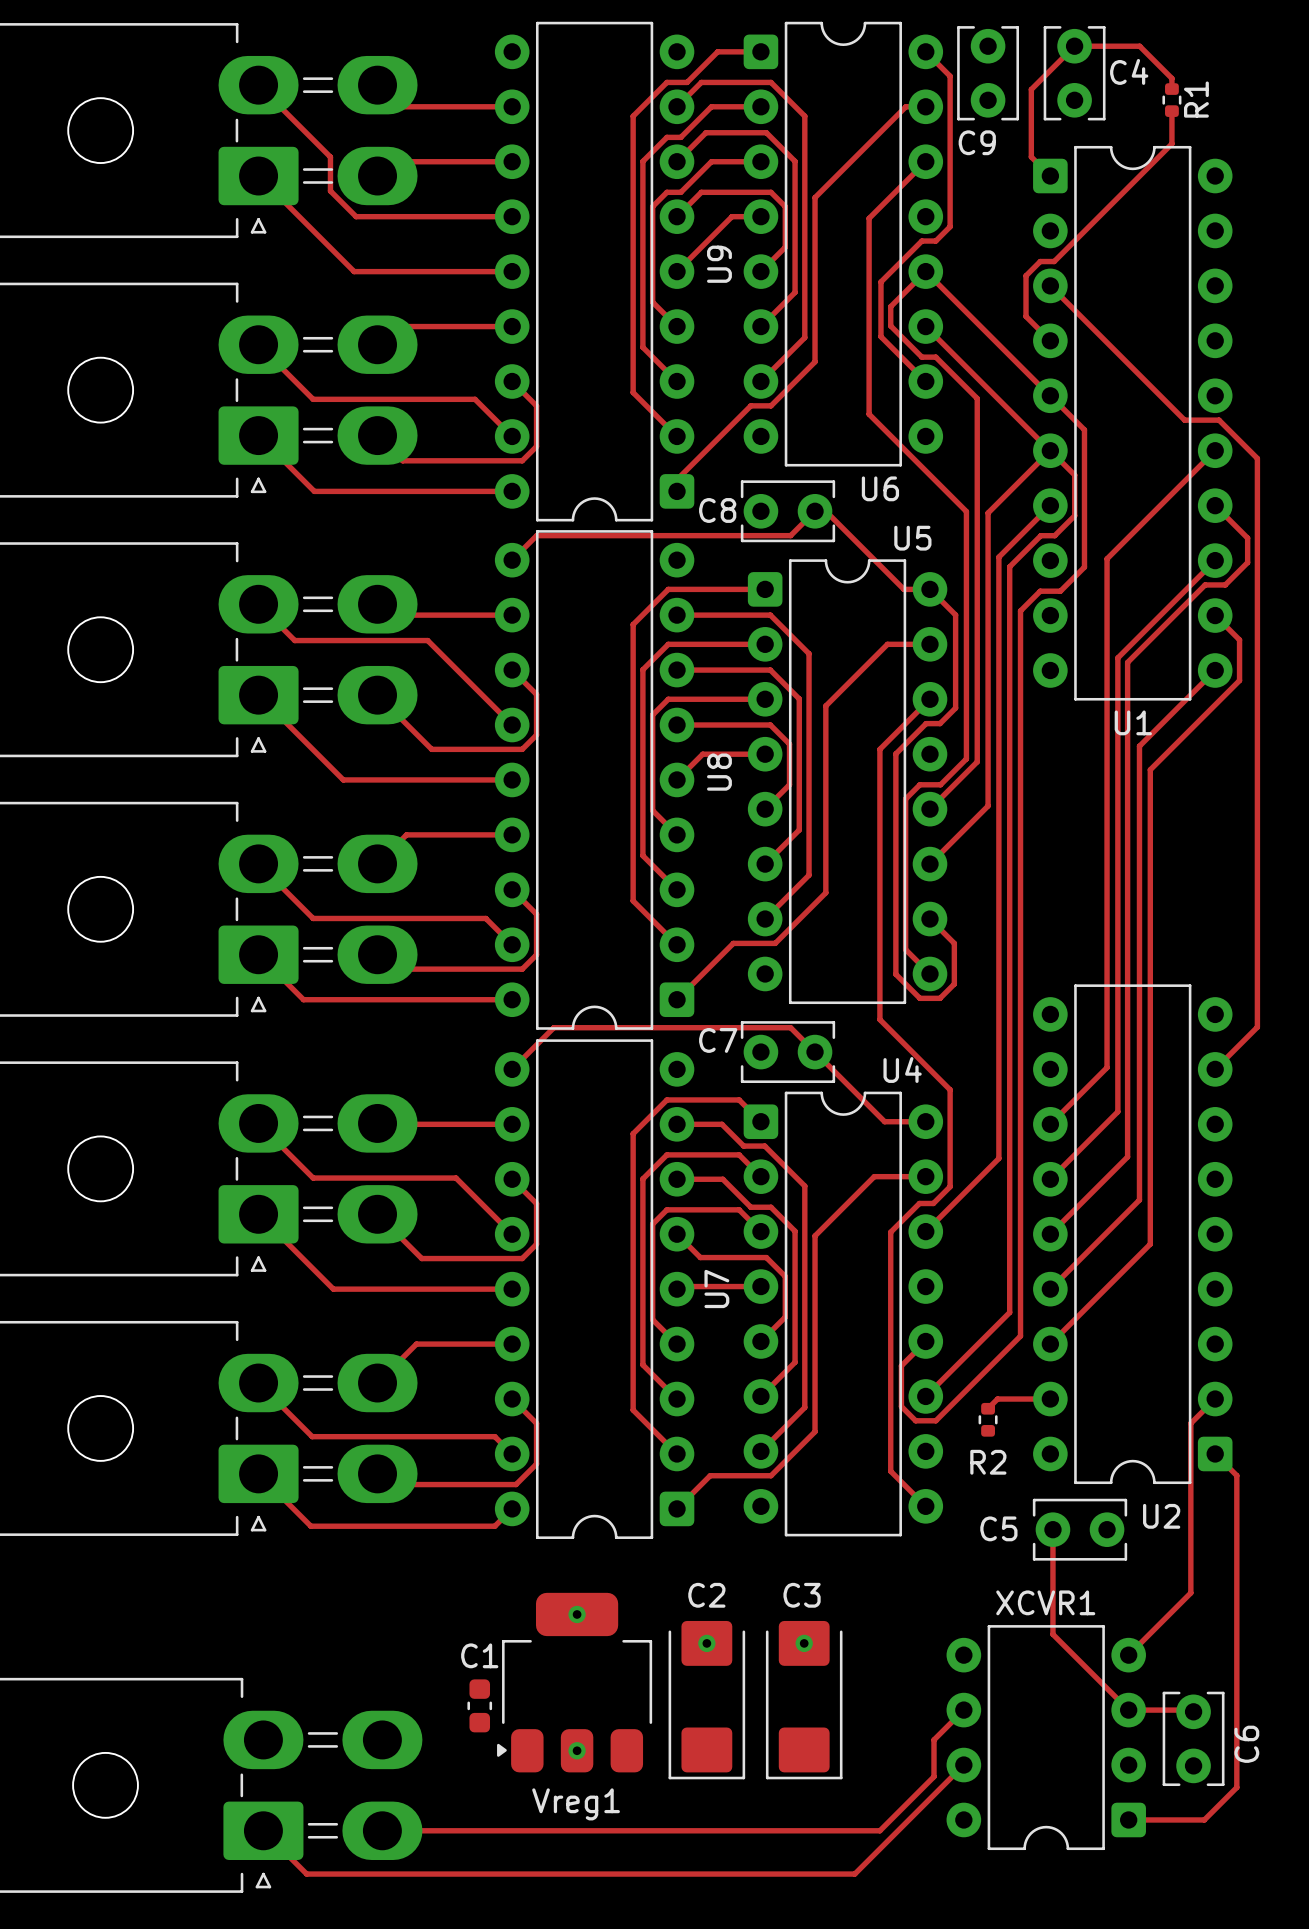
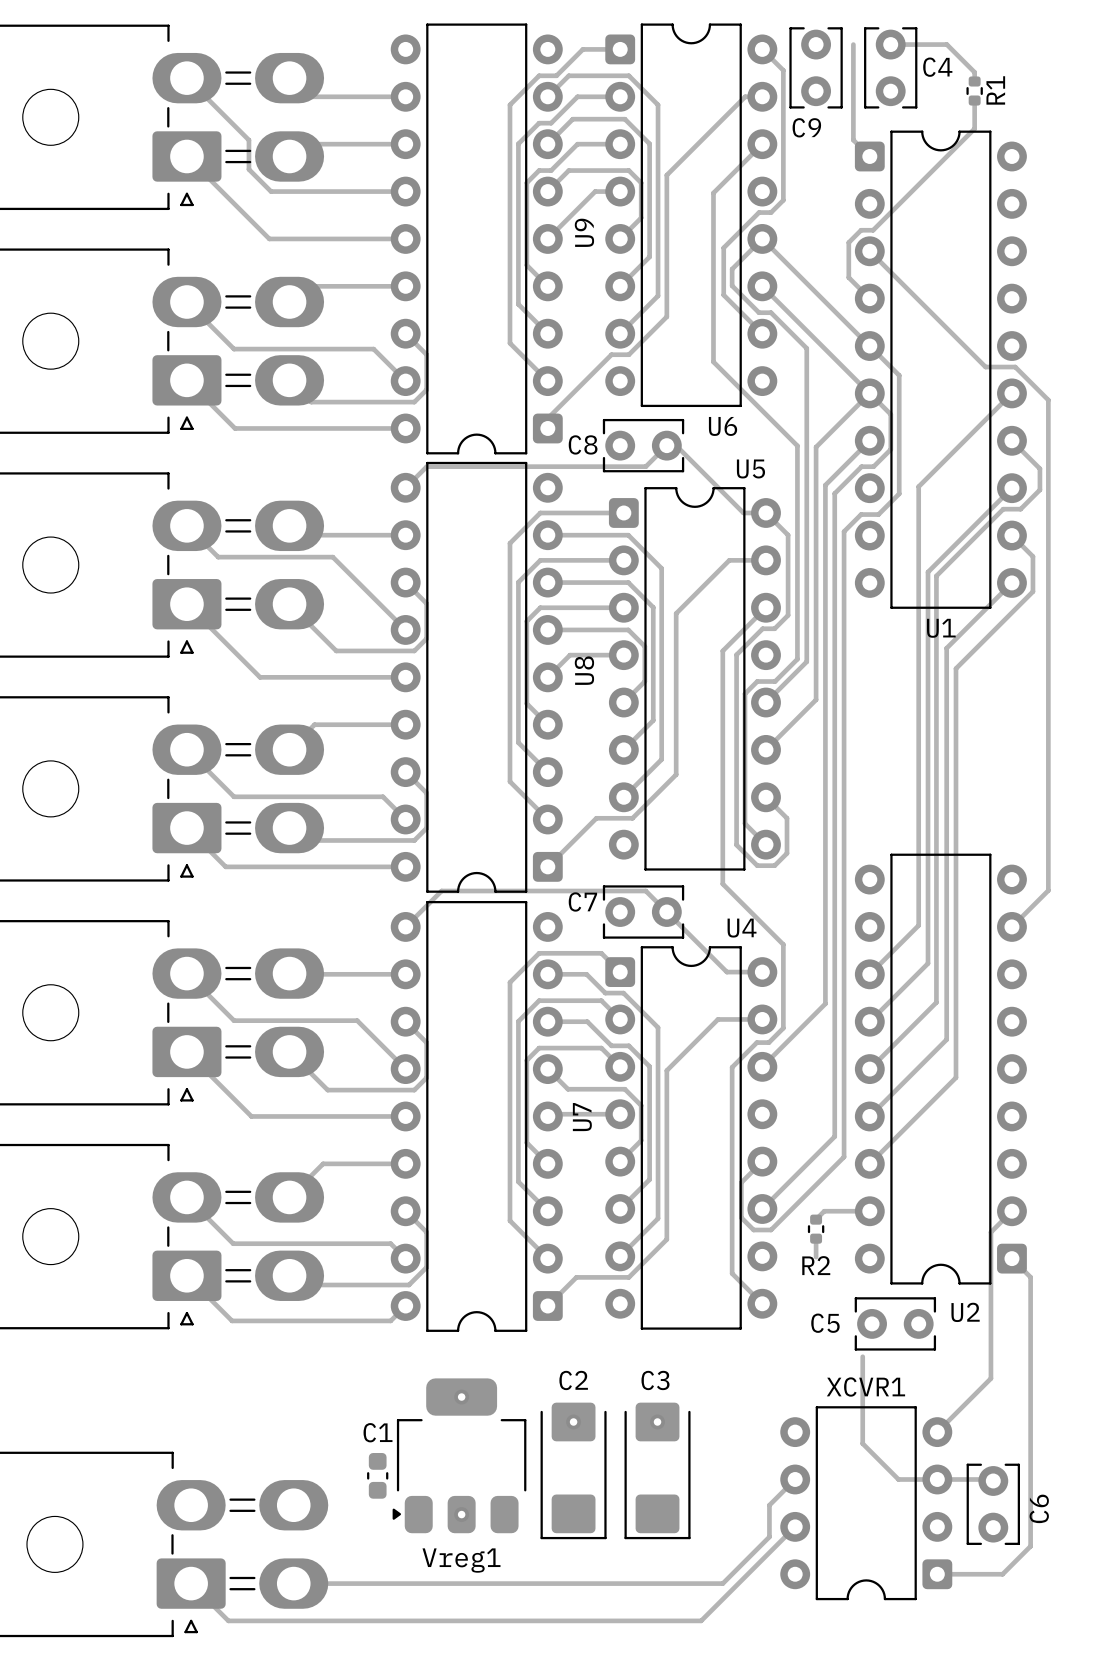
track: (1074, 46) (1031, 89) -> (853, 44) (853, 81)
track: none -> (816, 1238) (816, 1257)
track: (1052, 1529) (1052, 1634) (1128, 1710) -> (862, 1356) (862, 1443) (898, 1479) (937, 1479)

